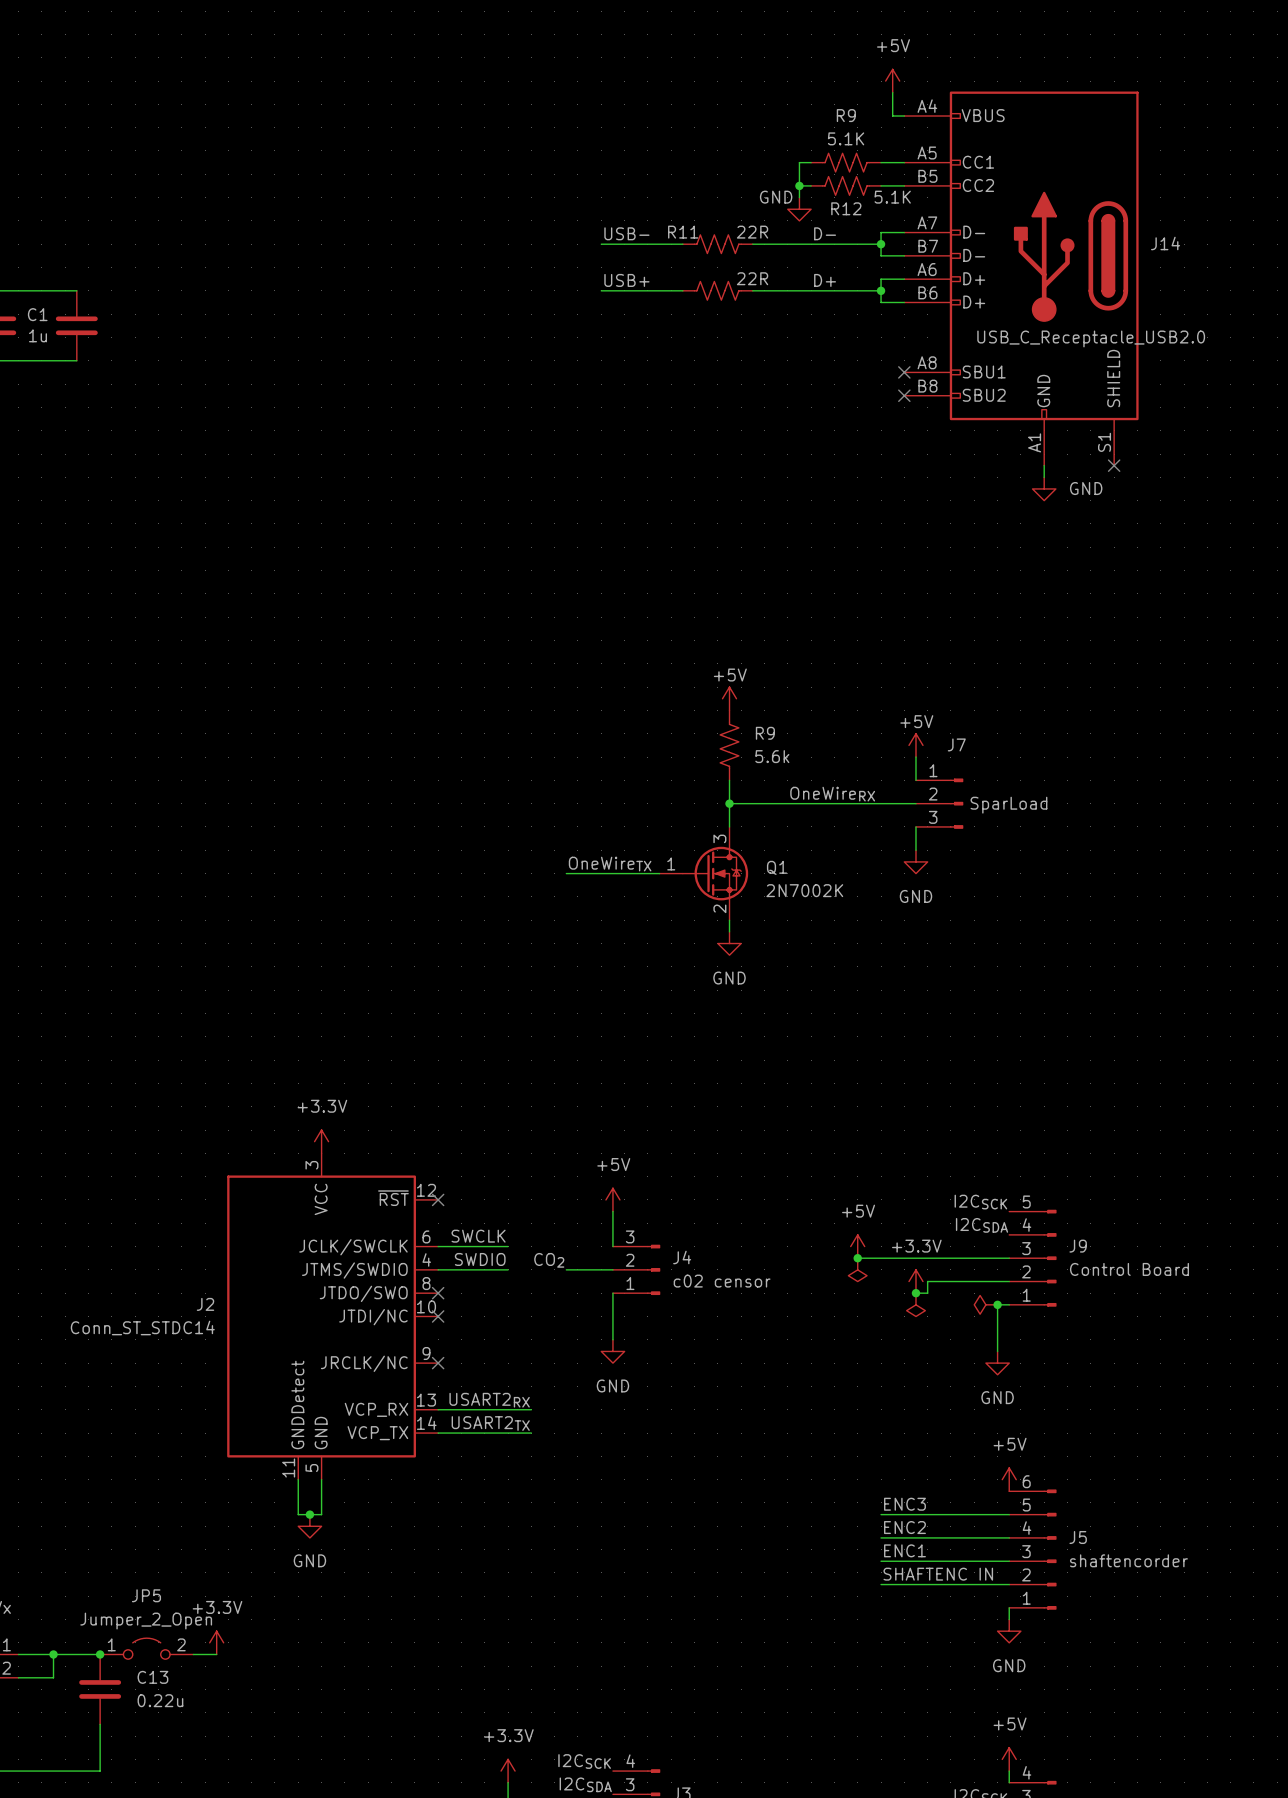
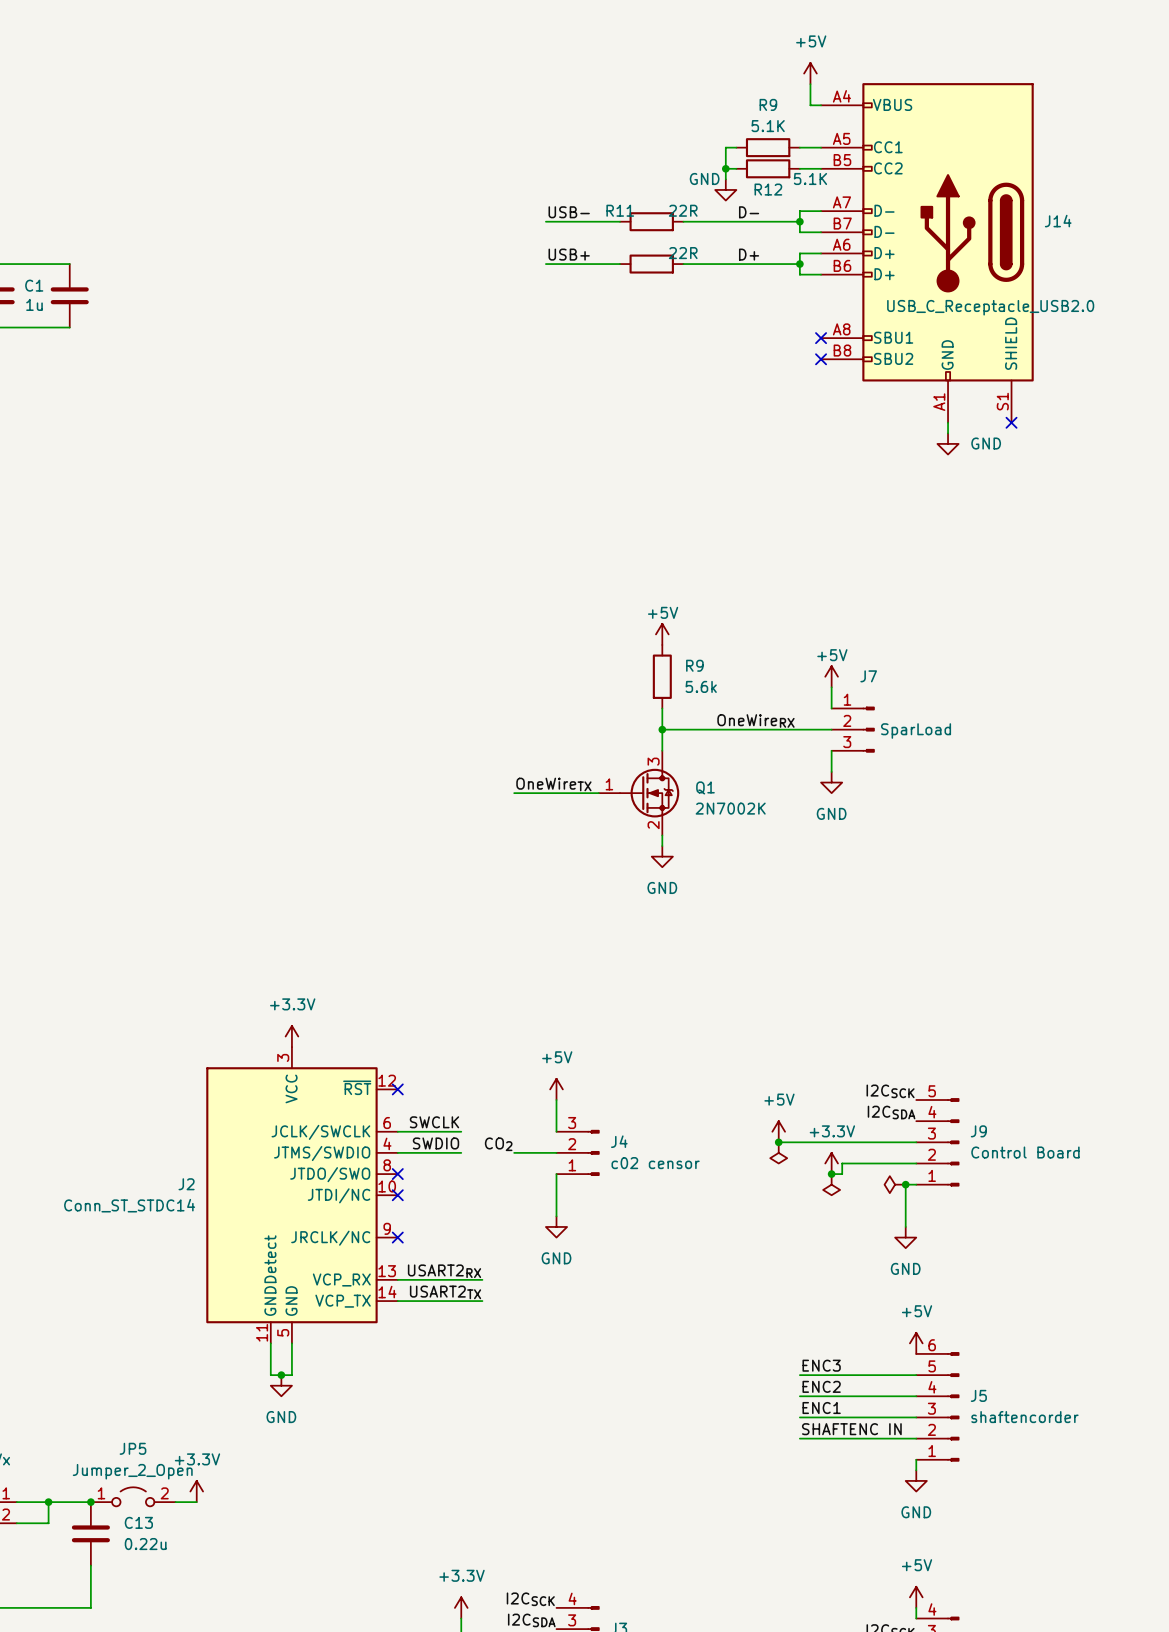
R9 symbol: [811, 153, 882, 172] -> [736, 138, 800, 158]
R12 symbol: [811, 176, 882, 196] -> [736, 159, 800, 179]
R11 symbol: [682, 234, 753, 254] -> [619, 212, 684, 232]
part symbol: [682, 281, 753, 301] -> [619, 254, 684, 274]
R9 symbol: [720, 710, 739, 781] -> [652, 644, 672, 709]

